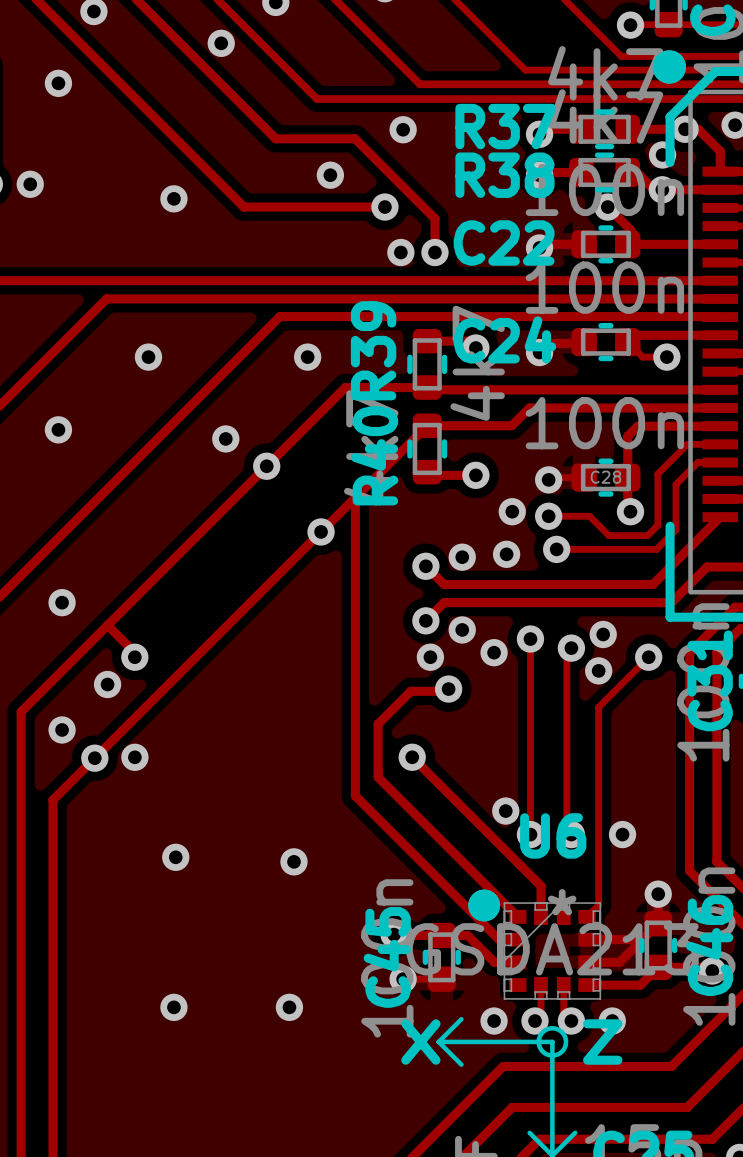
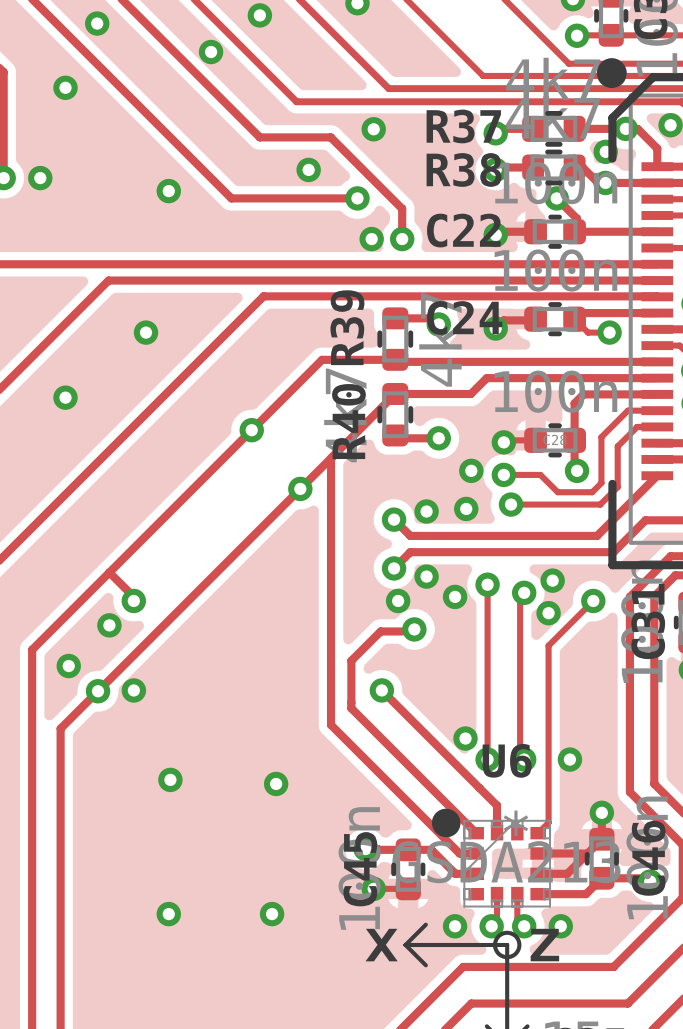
via: (307, 357) -> none
via: (225, 438) -> none
via: (62, 602) -> none

